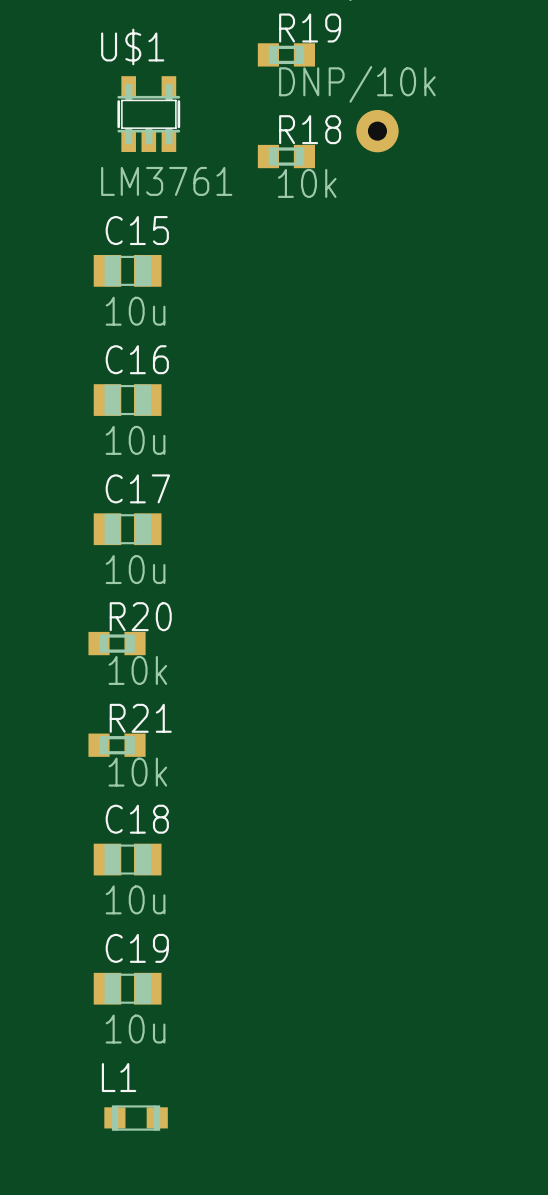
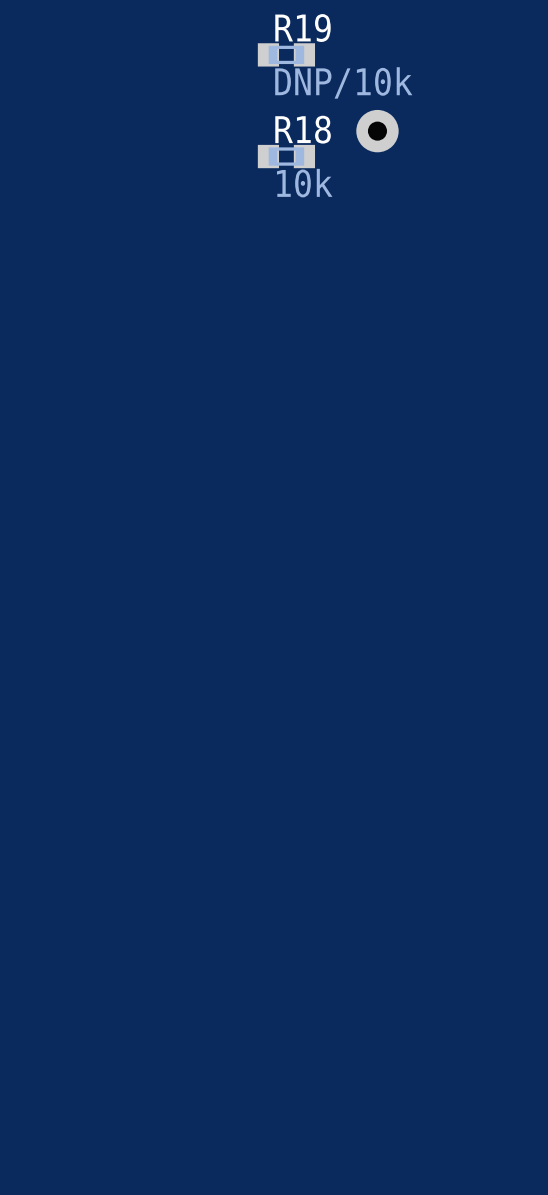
U$1: LM3761 (148, 114) -> none
C15: 10u (127, 270) -> none
C16: 10u (127, 400) -> none
C17: 10u (127, 529) -> none
R20: 10k (117, 643) -> none
R21: 10k (117, 745) -> none
C18: 10u (127, 859) -> none
C19: 10u (127, 988) -> none
L1: (136, 1118) -> none

